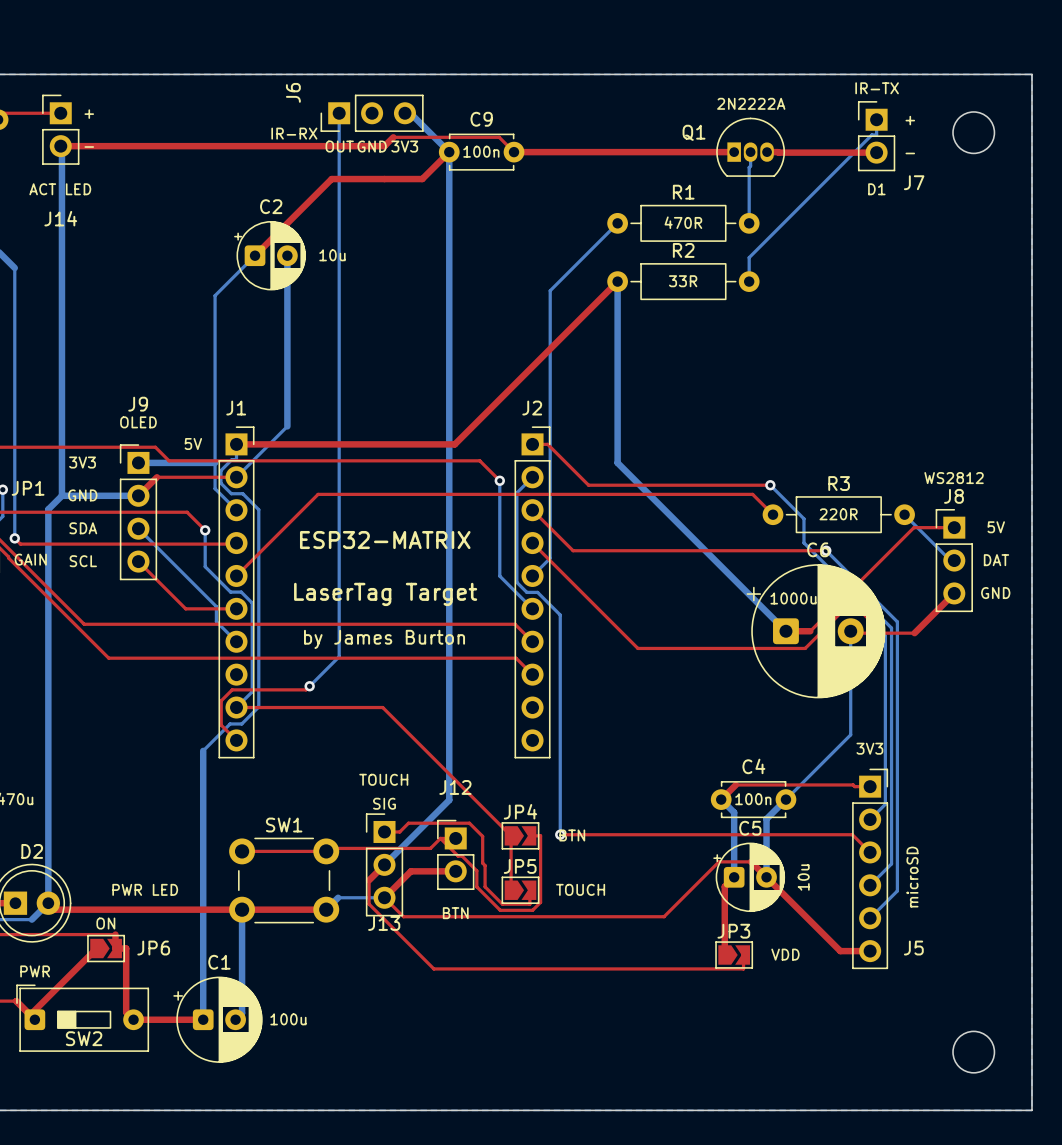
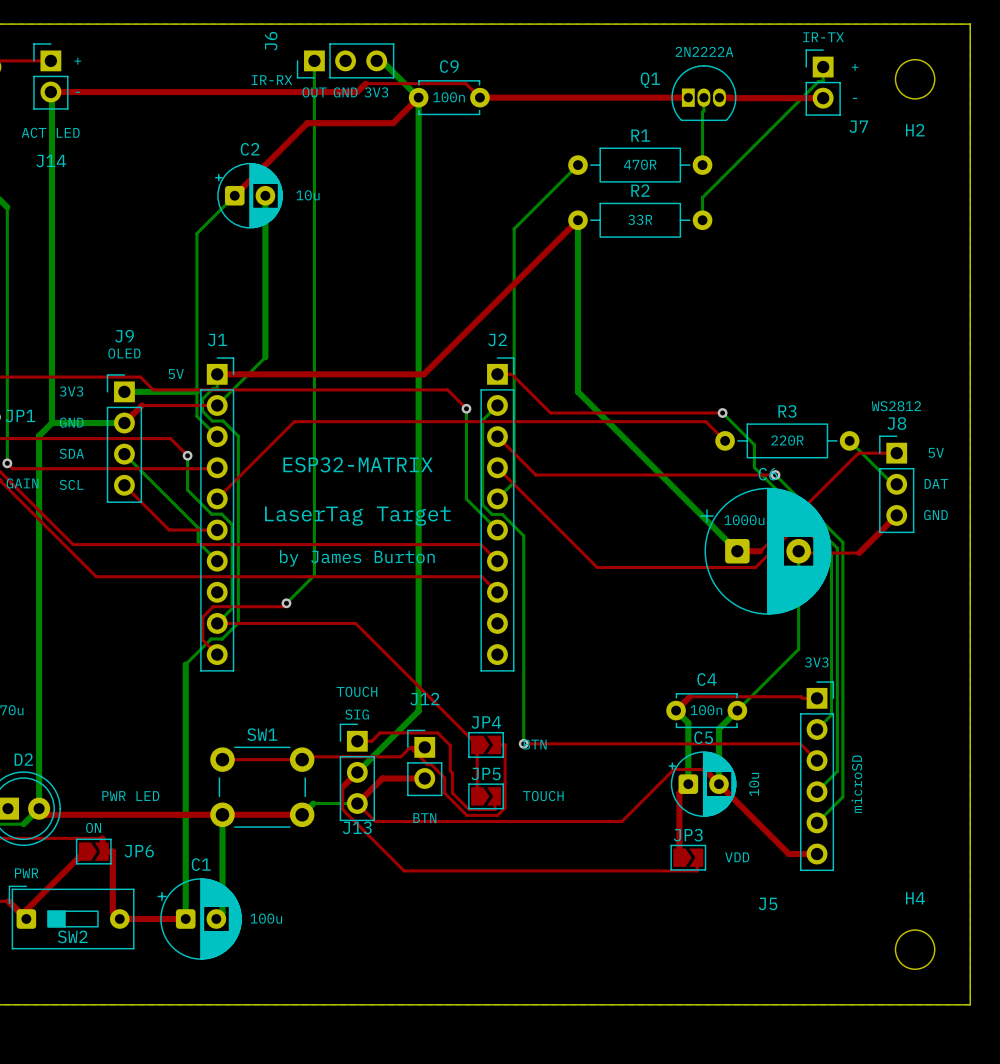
H2 name: none -> H2 (915, 130)
text: D1 (876, 189) -> none
J5 name position: J5 (913, 948) -> J5 (768, 903)
H4 name: none -> H4 (915, 898)

